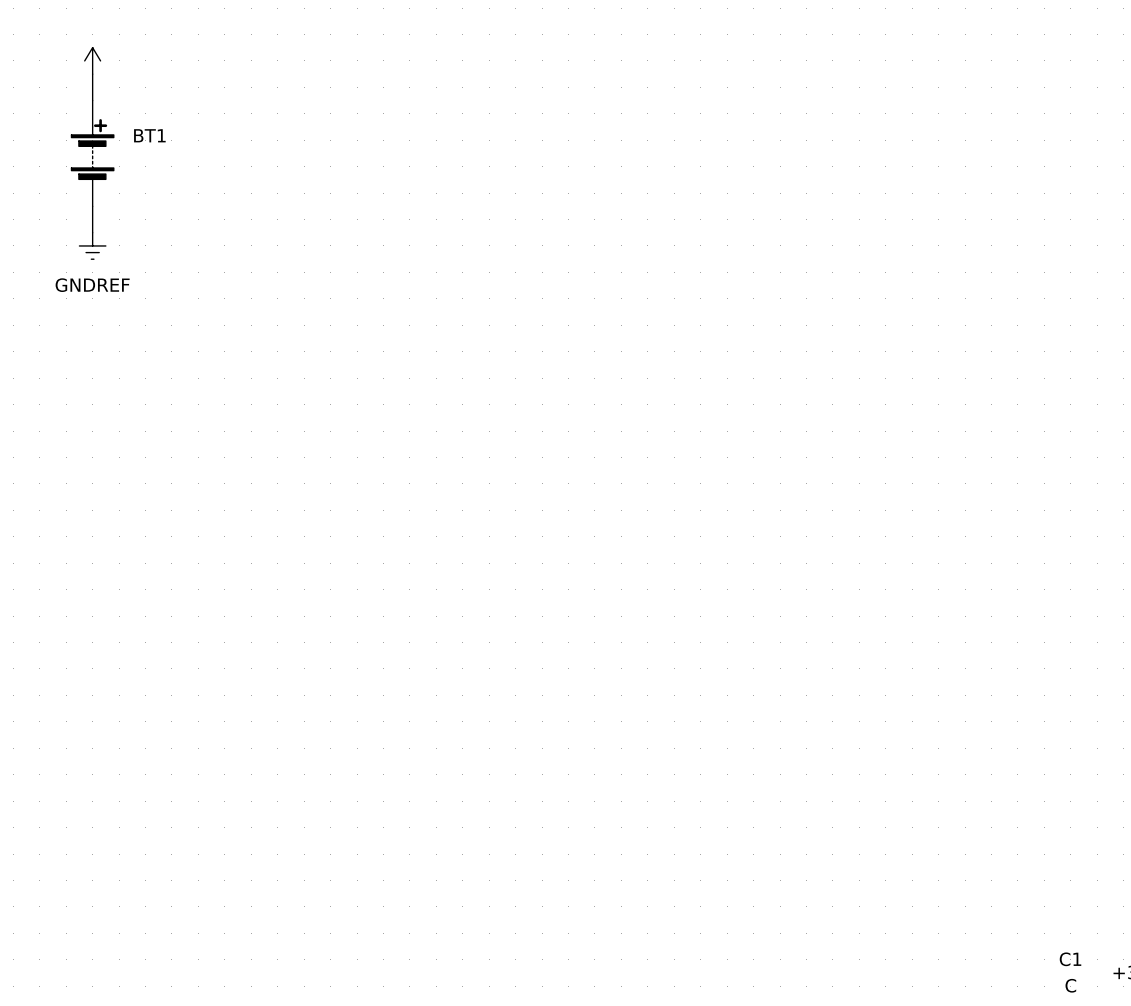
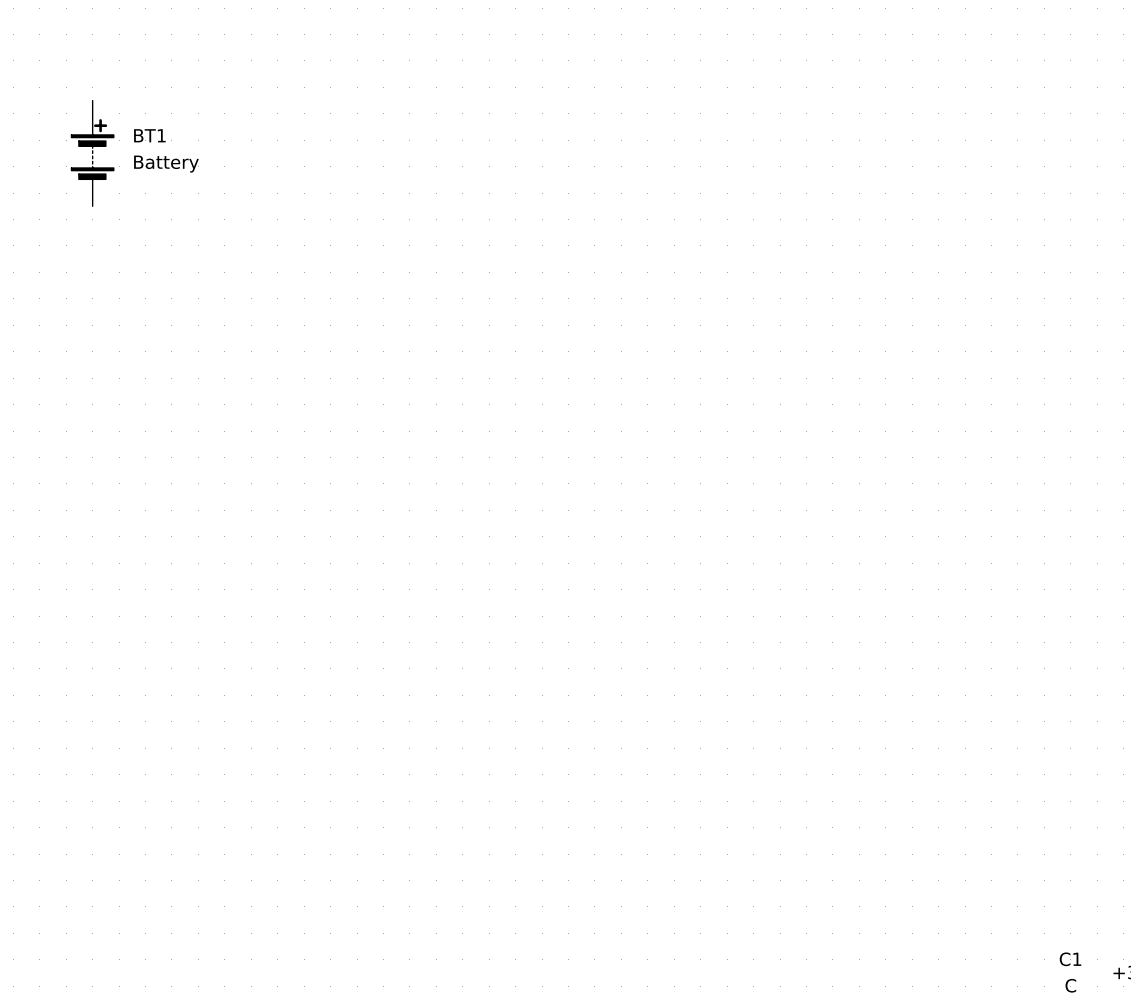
power symbol: (92, 60) -> none
wire: (92, 74) (92, 100) -> none
BT1 value: none -> Battery (166, 164)
wire: (92, 206) (92, 232) -> none
power symbol: GNDREF (92, 245) -> none

